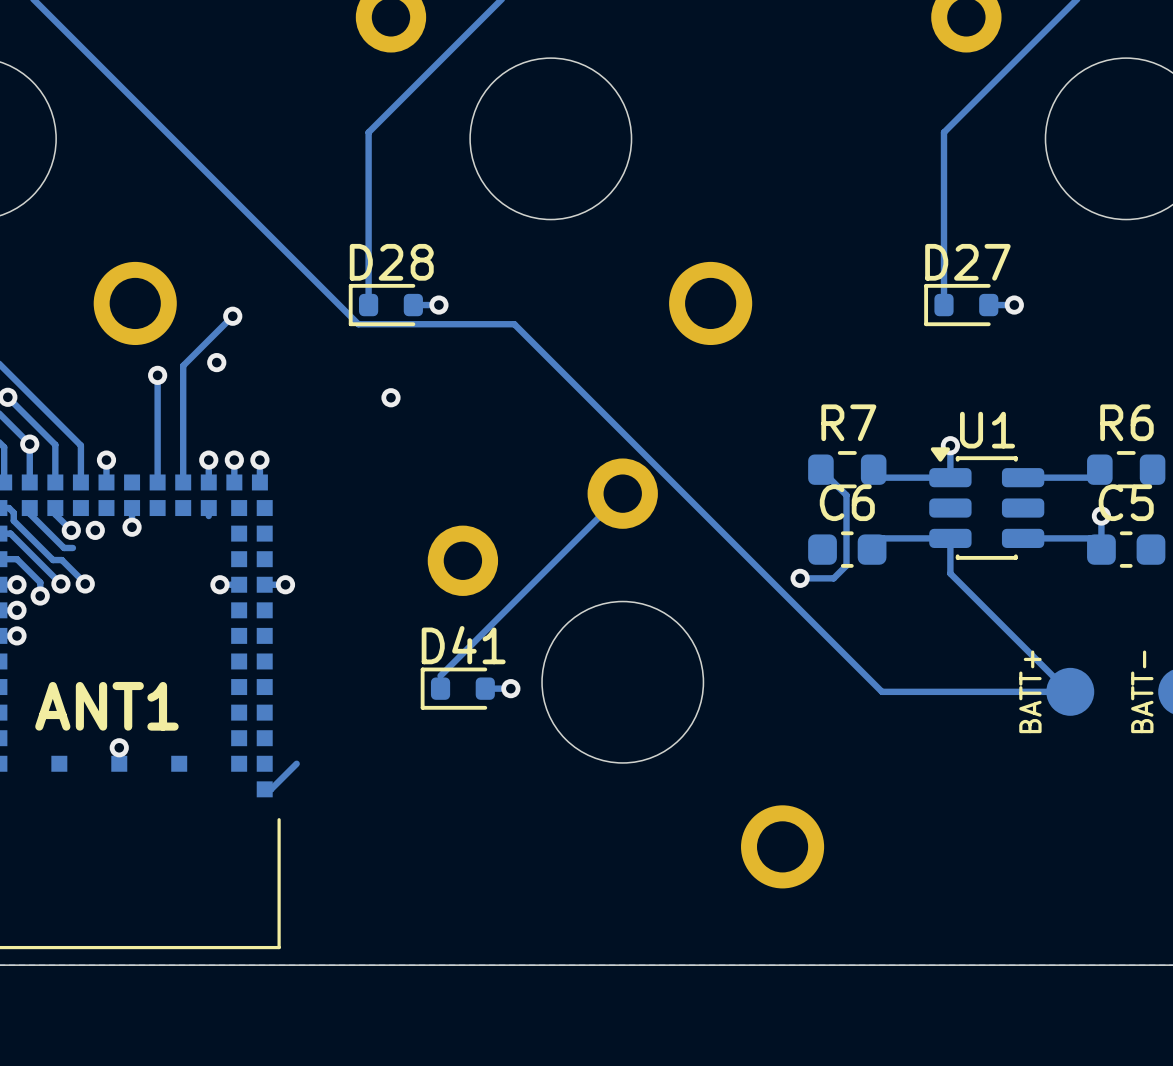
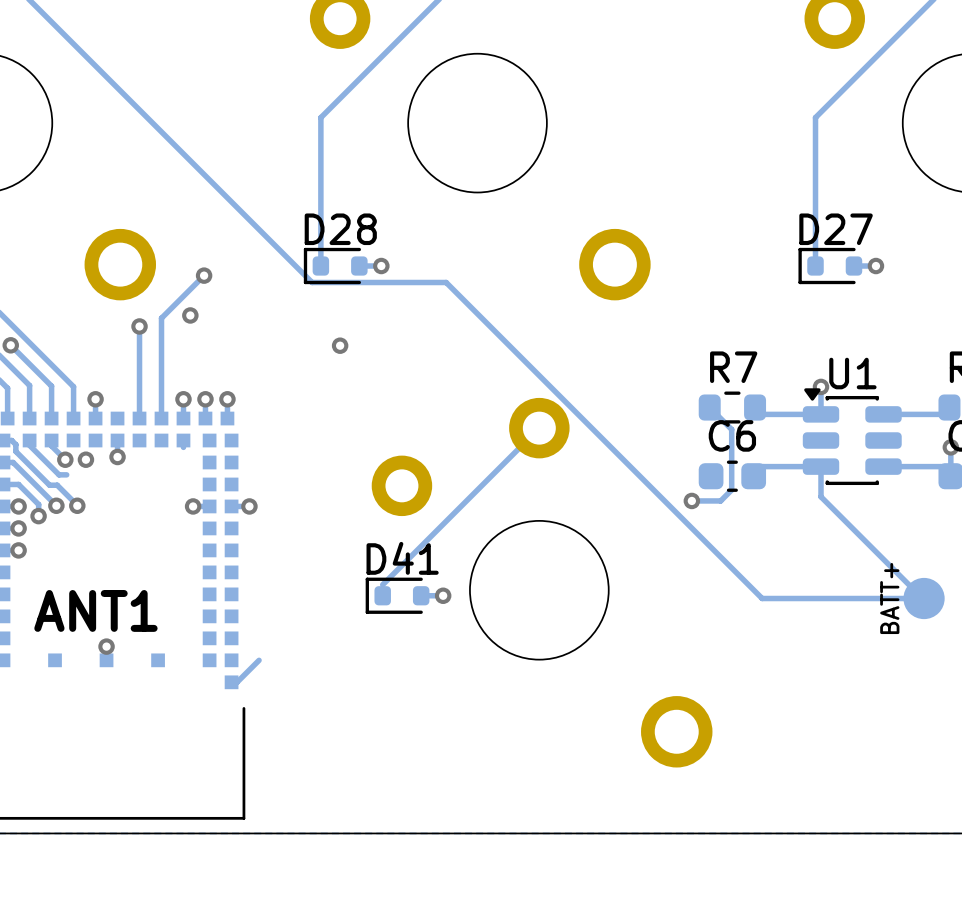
via: (29, 444) -> none

